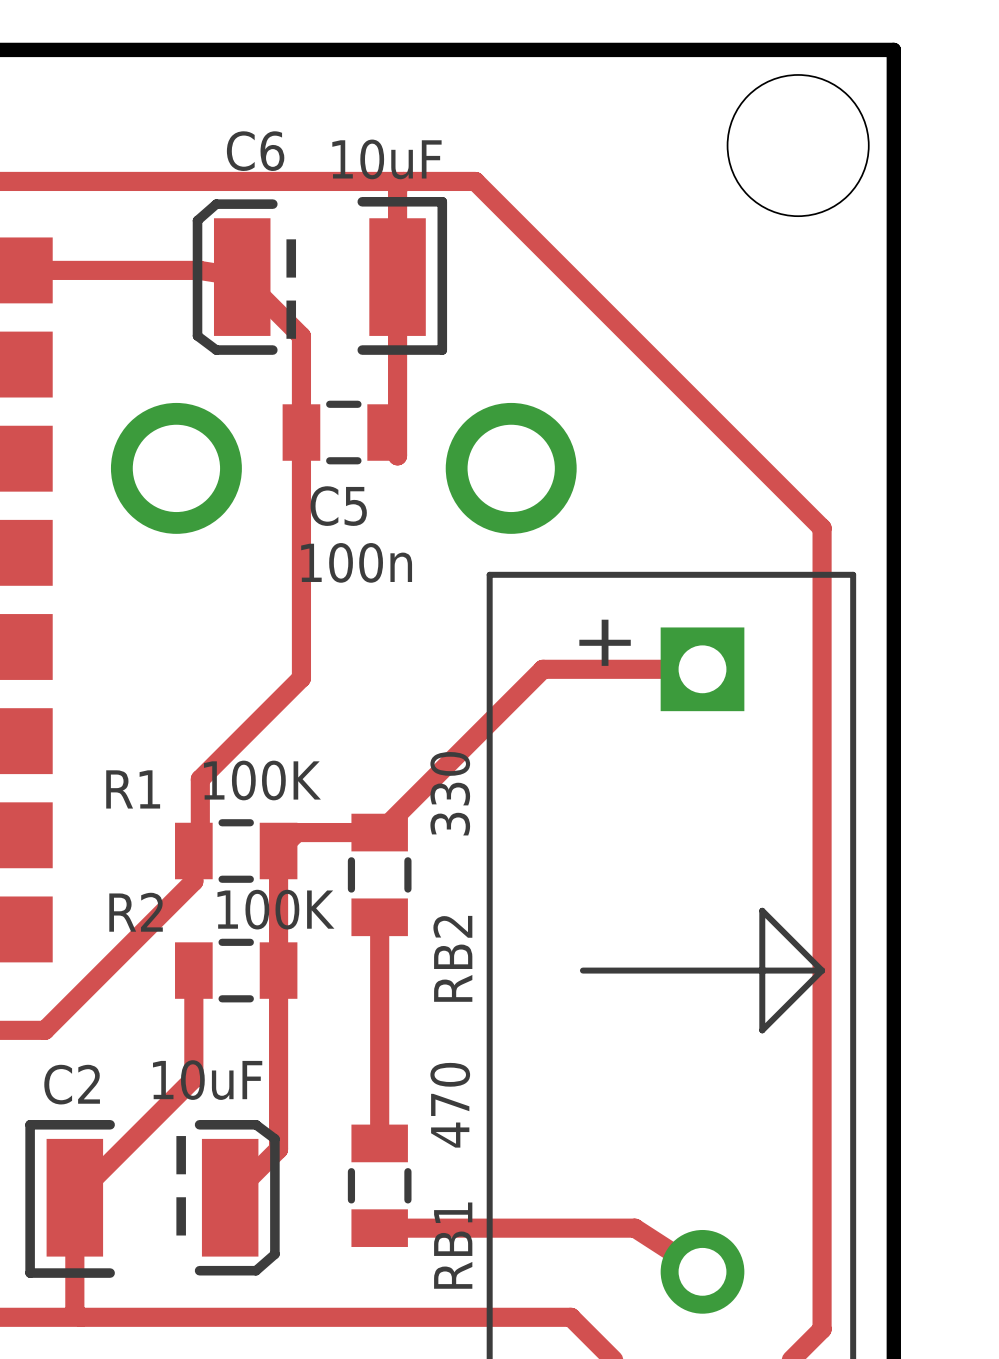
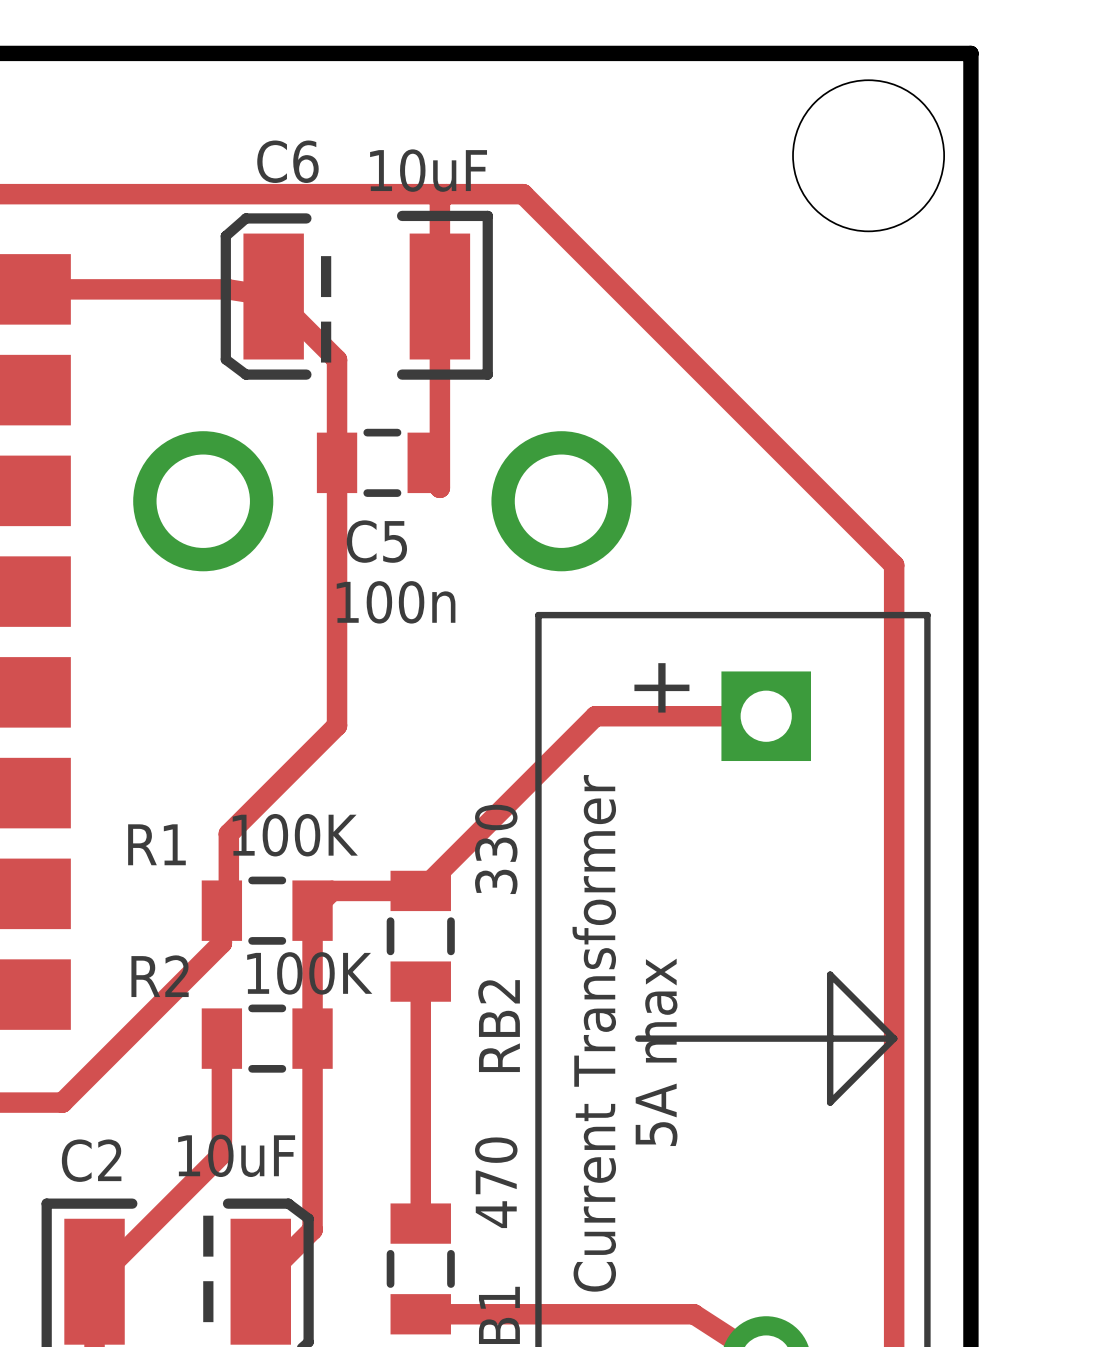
text: none -> Current Transformer (594, 1033)
text: none -> 5A max (656, 1052)

